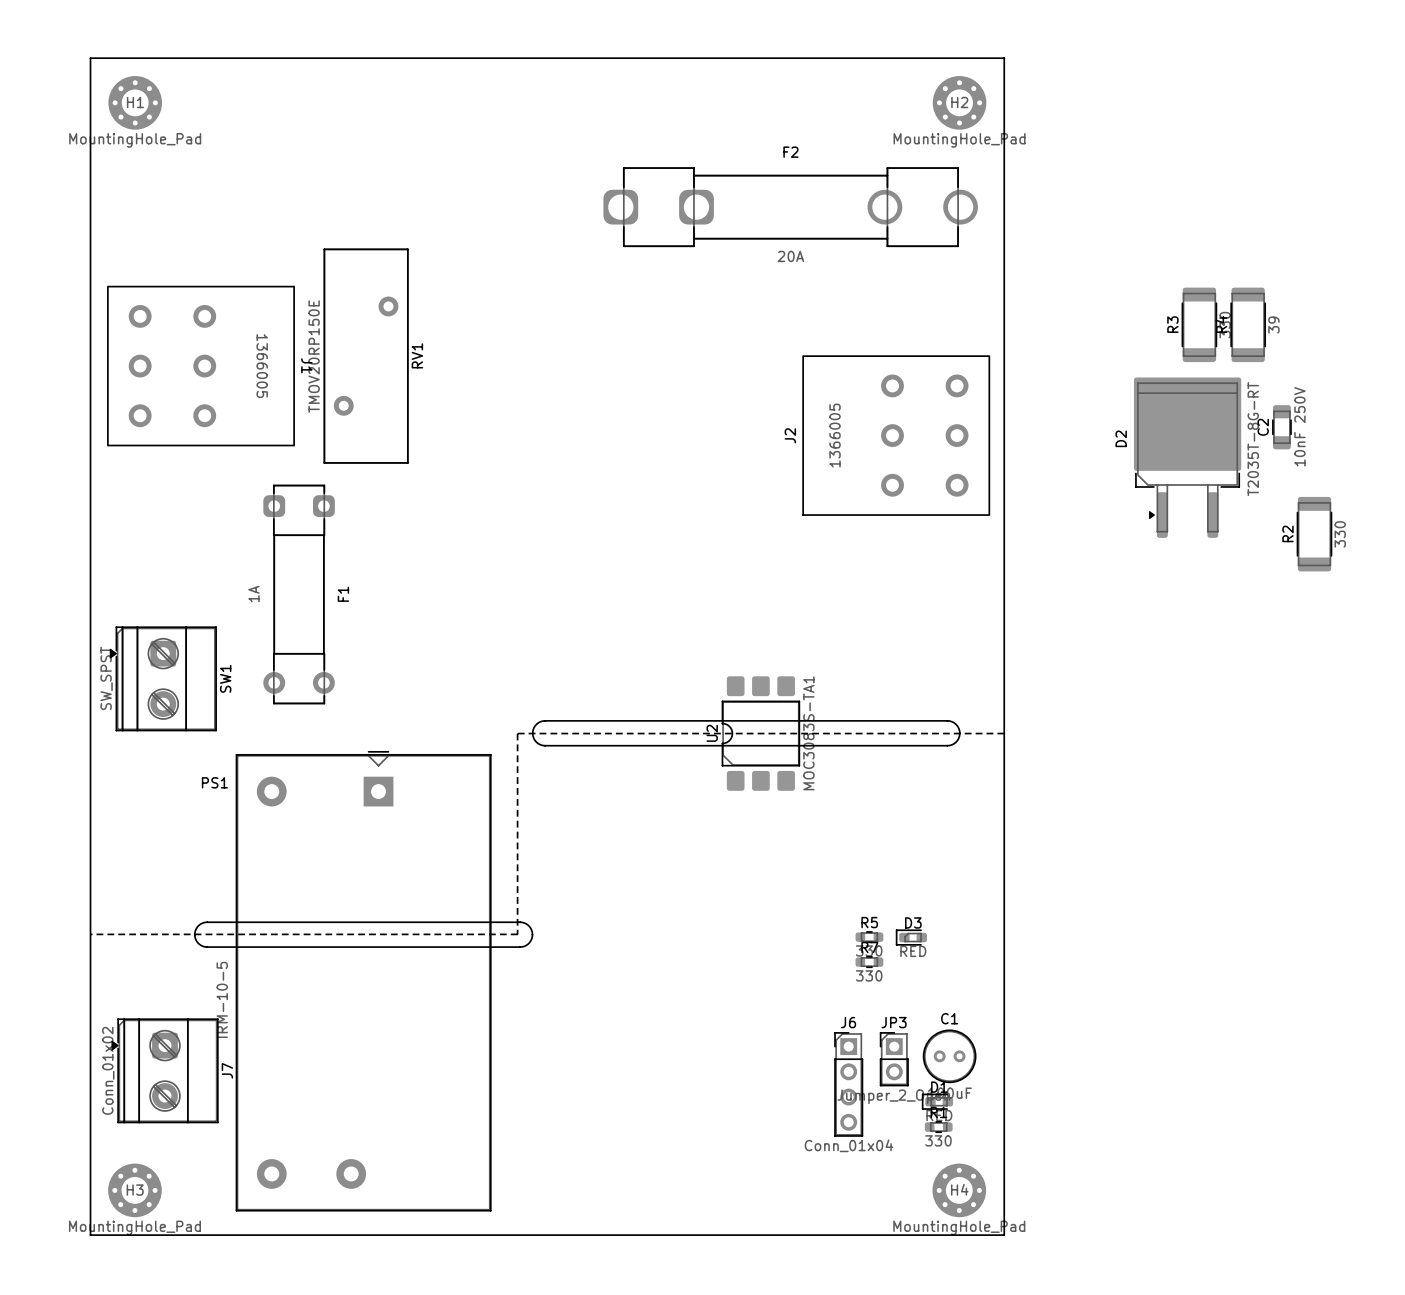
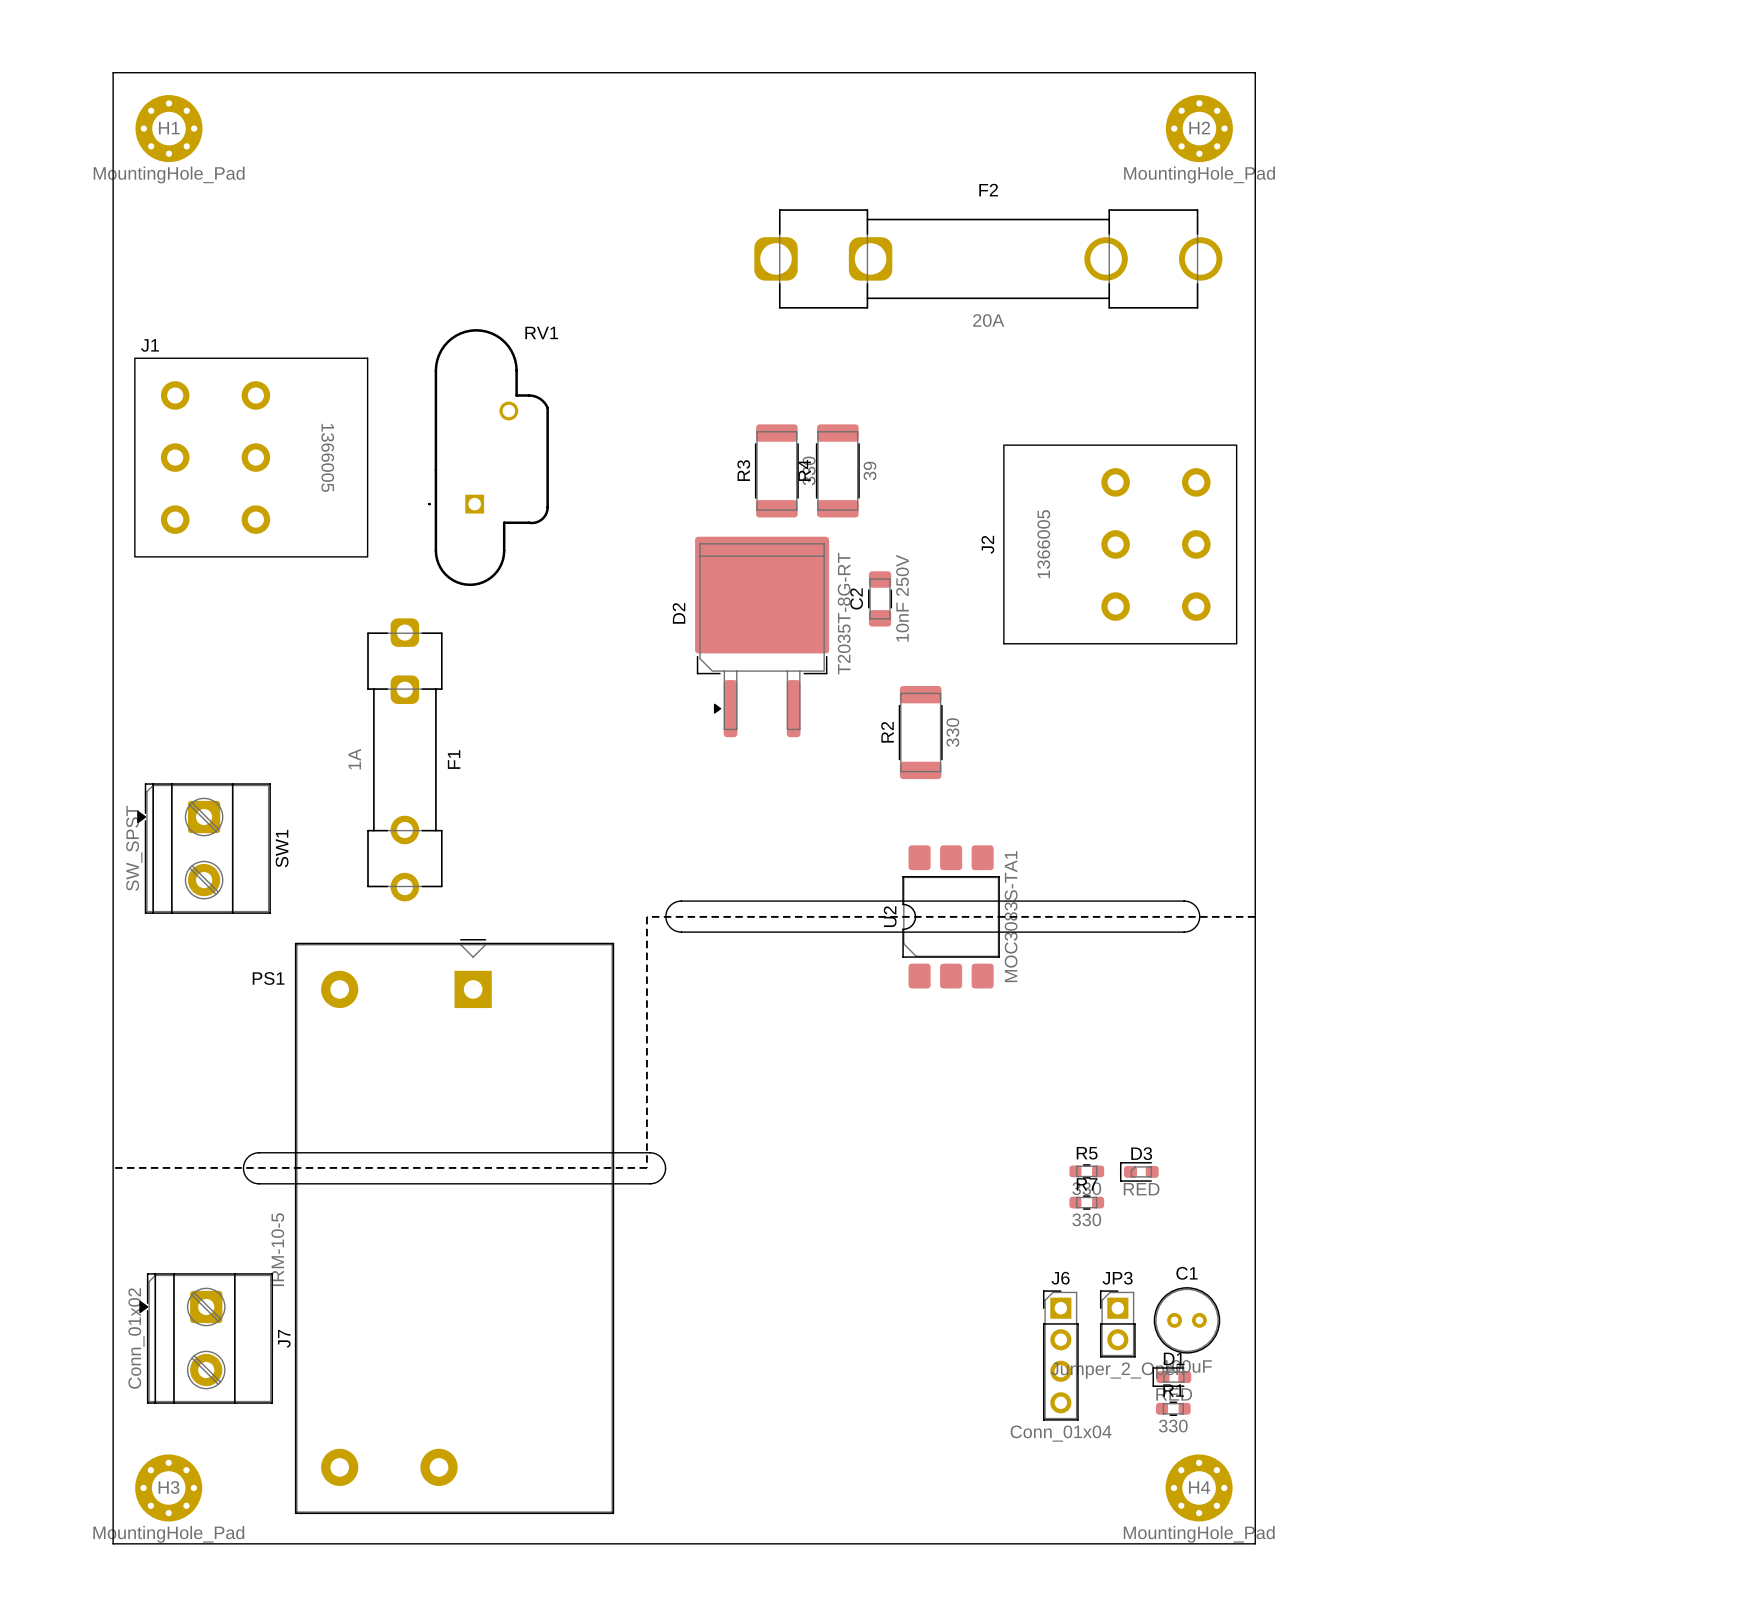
RV1 footprint: [323, 248, 409, 464] -> [428, 329, 549, 587]
R3 position: (1199, 324) -> (776, 470)
R4 position: (1248, 324) -> (837, 470)
RV1 name position: RV1 (417, 355) -> RV1 (541, 332)
RV1 value: TMOV20RP150E (314, 356) -> none
J1 name rotation: 0° (306, 365) -> 90° counterclockwise (150, 345)
J1 name position: J1 (306, 365) -> J1 (150, 345)
C2 position: (1281, 427) -> (880, 598)
D2 position: (1187, 457) -> (762, 636)
F1 footprint: [263, 484, 335, 705] -> [367, 618, 443, 902]
R2 position: (1314, 534) -> (920, 732)

